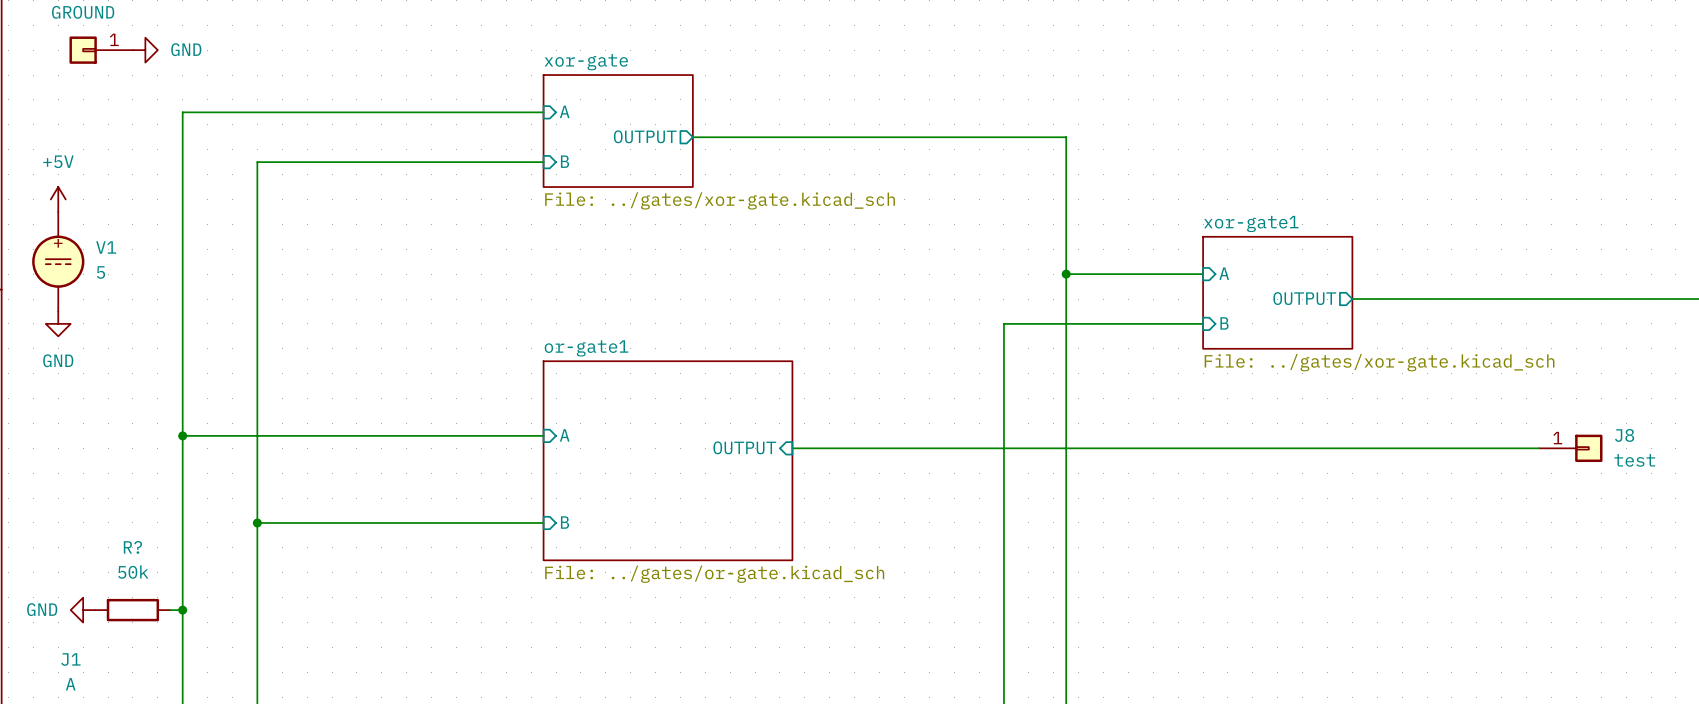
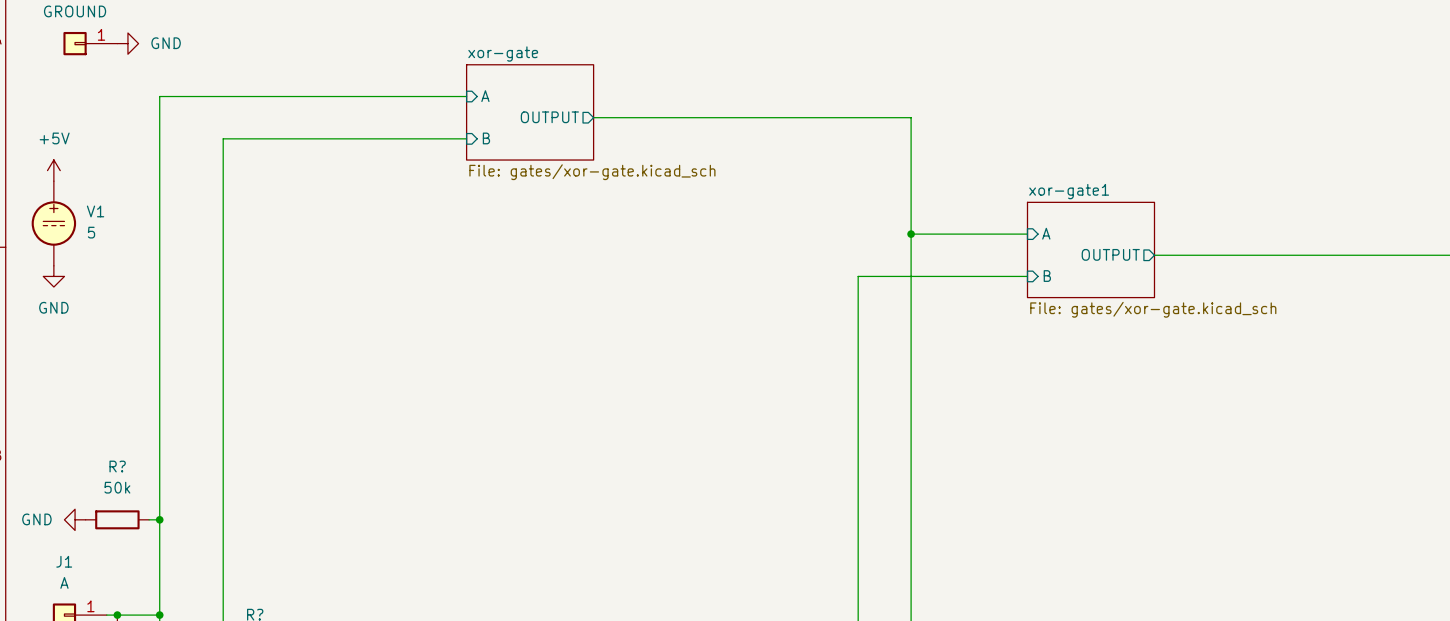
sheet xor-gate value: File: ../gates/xor-gate.kicad_sch (720, 200) -> File: gates/xor-gate.kicad_sch (592, 172)
sheet xor-gate1 value: File: ../gates/xor-gate.kicad_sch (1379, 362) -> File: gates/xor-gate.kicad_sch (1153, 309)
wire: (182, 435) (543, 435) -> none
junction: (182, 435) -> none
sheet pin: A (564, 435) -> none
sheet pin: OUTPUT (744, 447) -> none
wire: (792, 448) (1539, 448) -> none
J8: test (1570, 448) -> none
sheet or-gate1: File: ../gates/or-gate.kicad_sch (667, 460) -> none
wire: (257, 522) (543, 522) -> none
junction: (257, 522) -> none
sheet pin: B (564, 522) -> none

